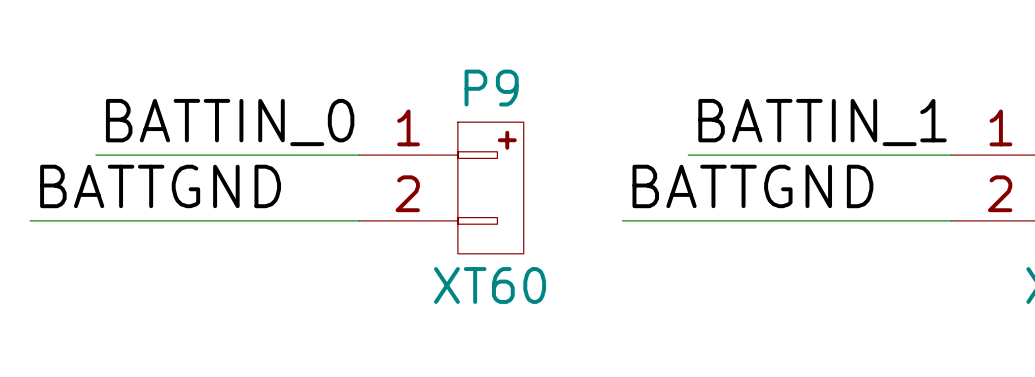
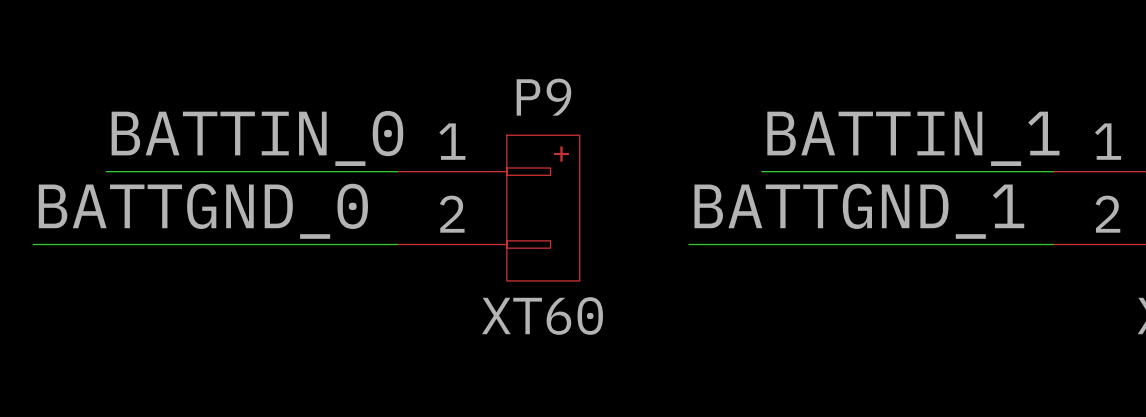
label: BATTGND (160, 186) -> BATTGND_0 (203, 211)
label: BATTGND (752, 186) -> BATTGND_1 (859, 211)

